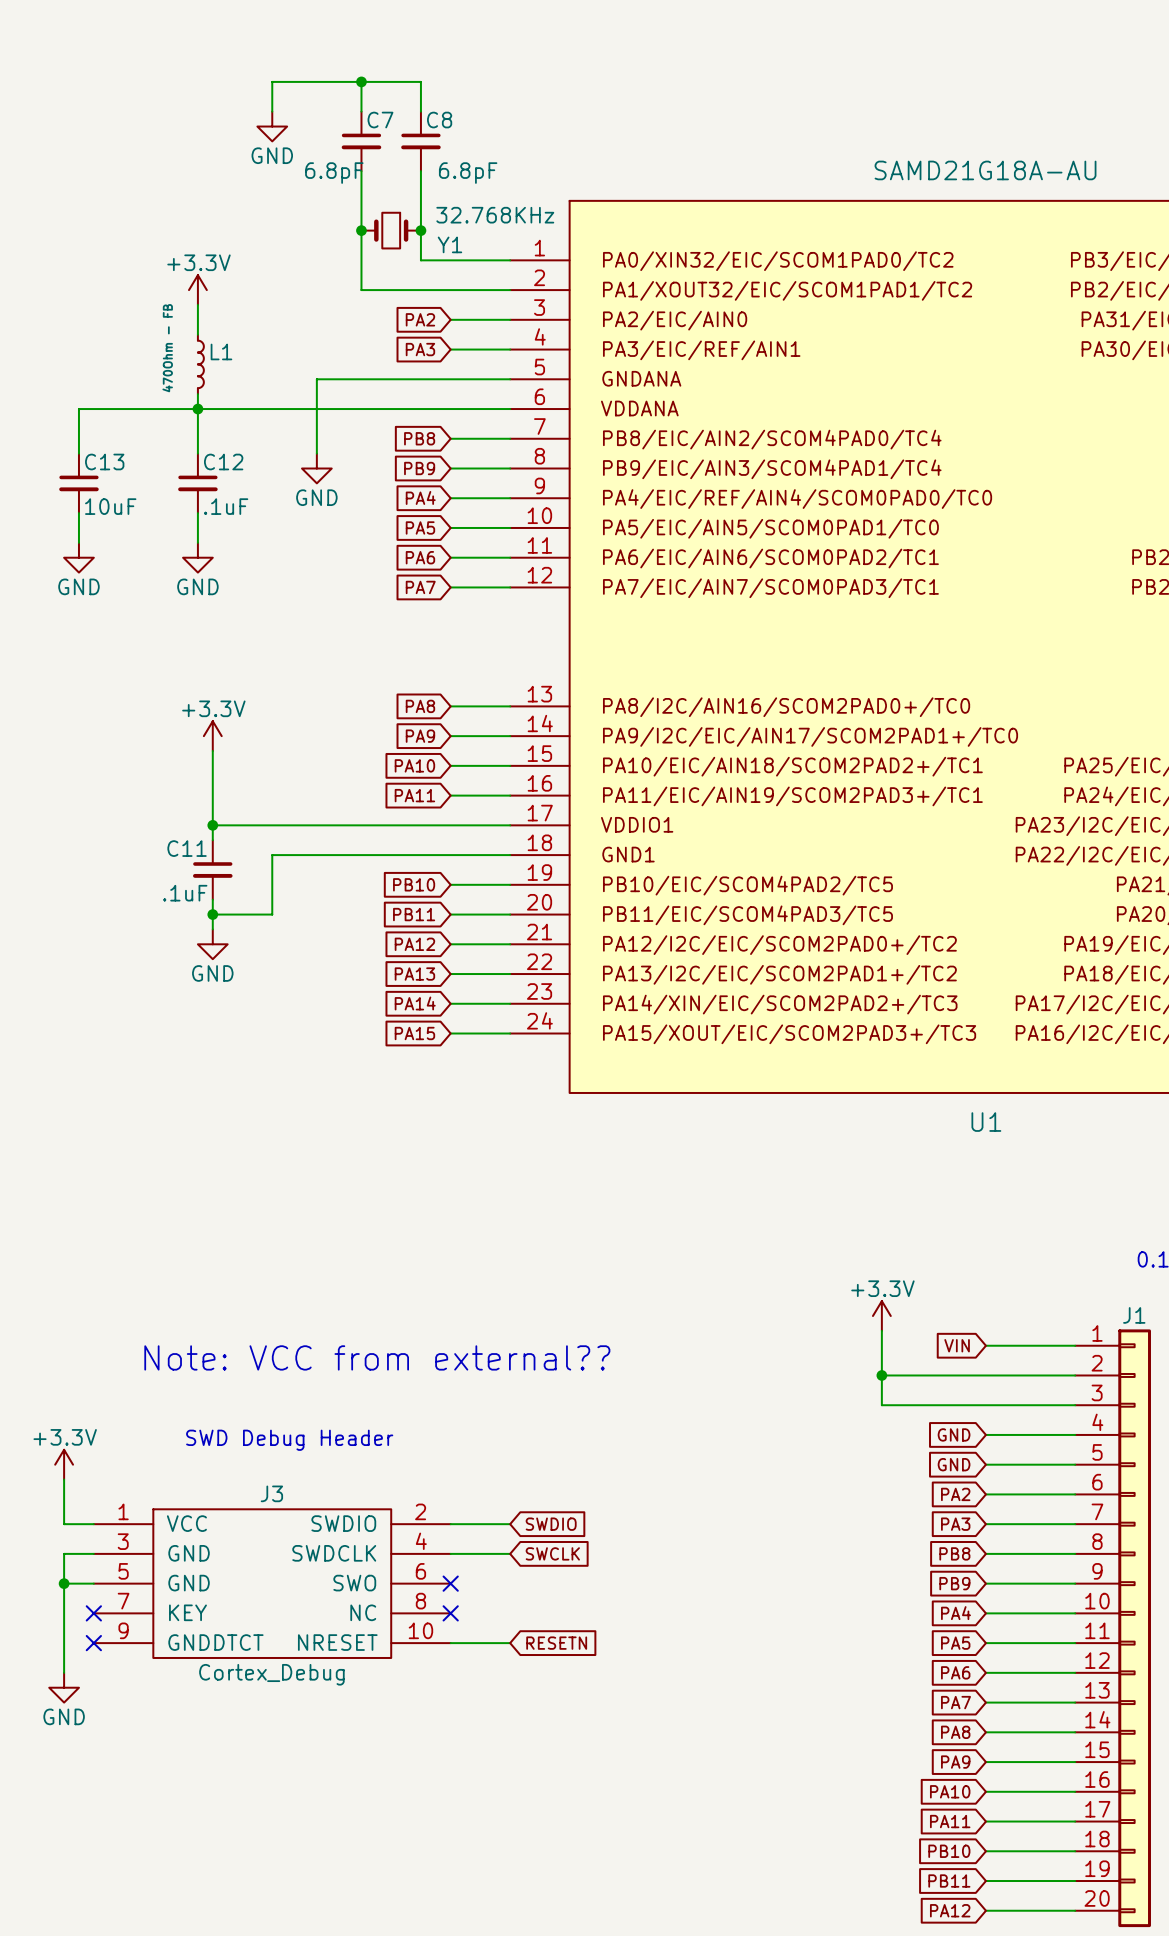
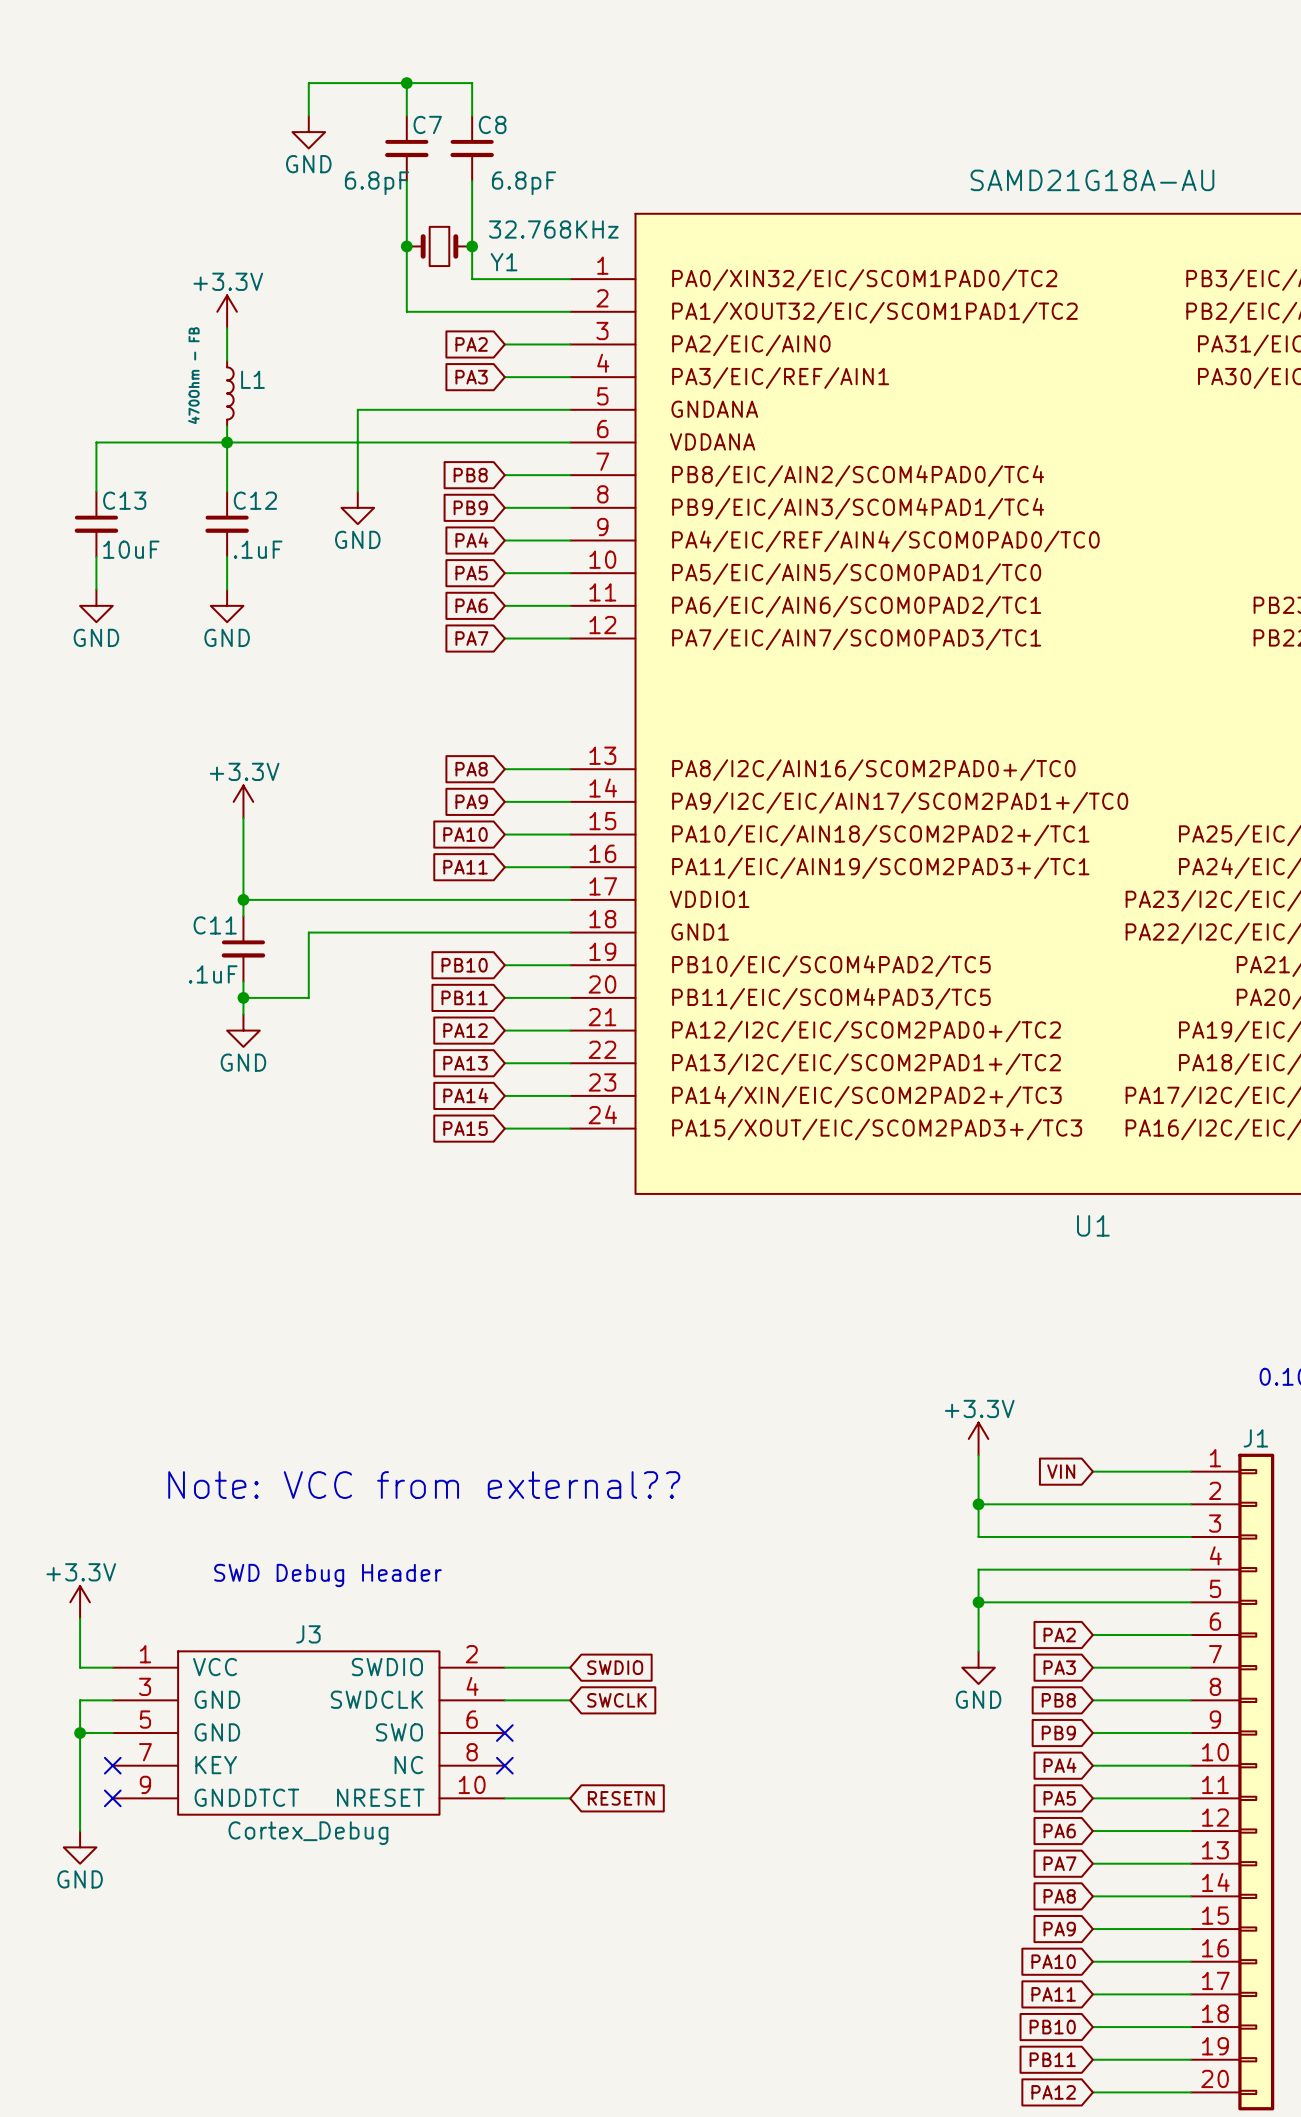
global label: GND (954, 1434) -> none
wire: none -> (1092, 1569) (978, 1569) (978, 1651)
wire: none -> (978, 1602) (1092, 1602)
junction: none -> (978, 1602)
global label: GND (954, 1464) -> none
power symbol: none -> GND (978, 1667)

